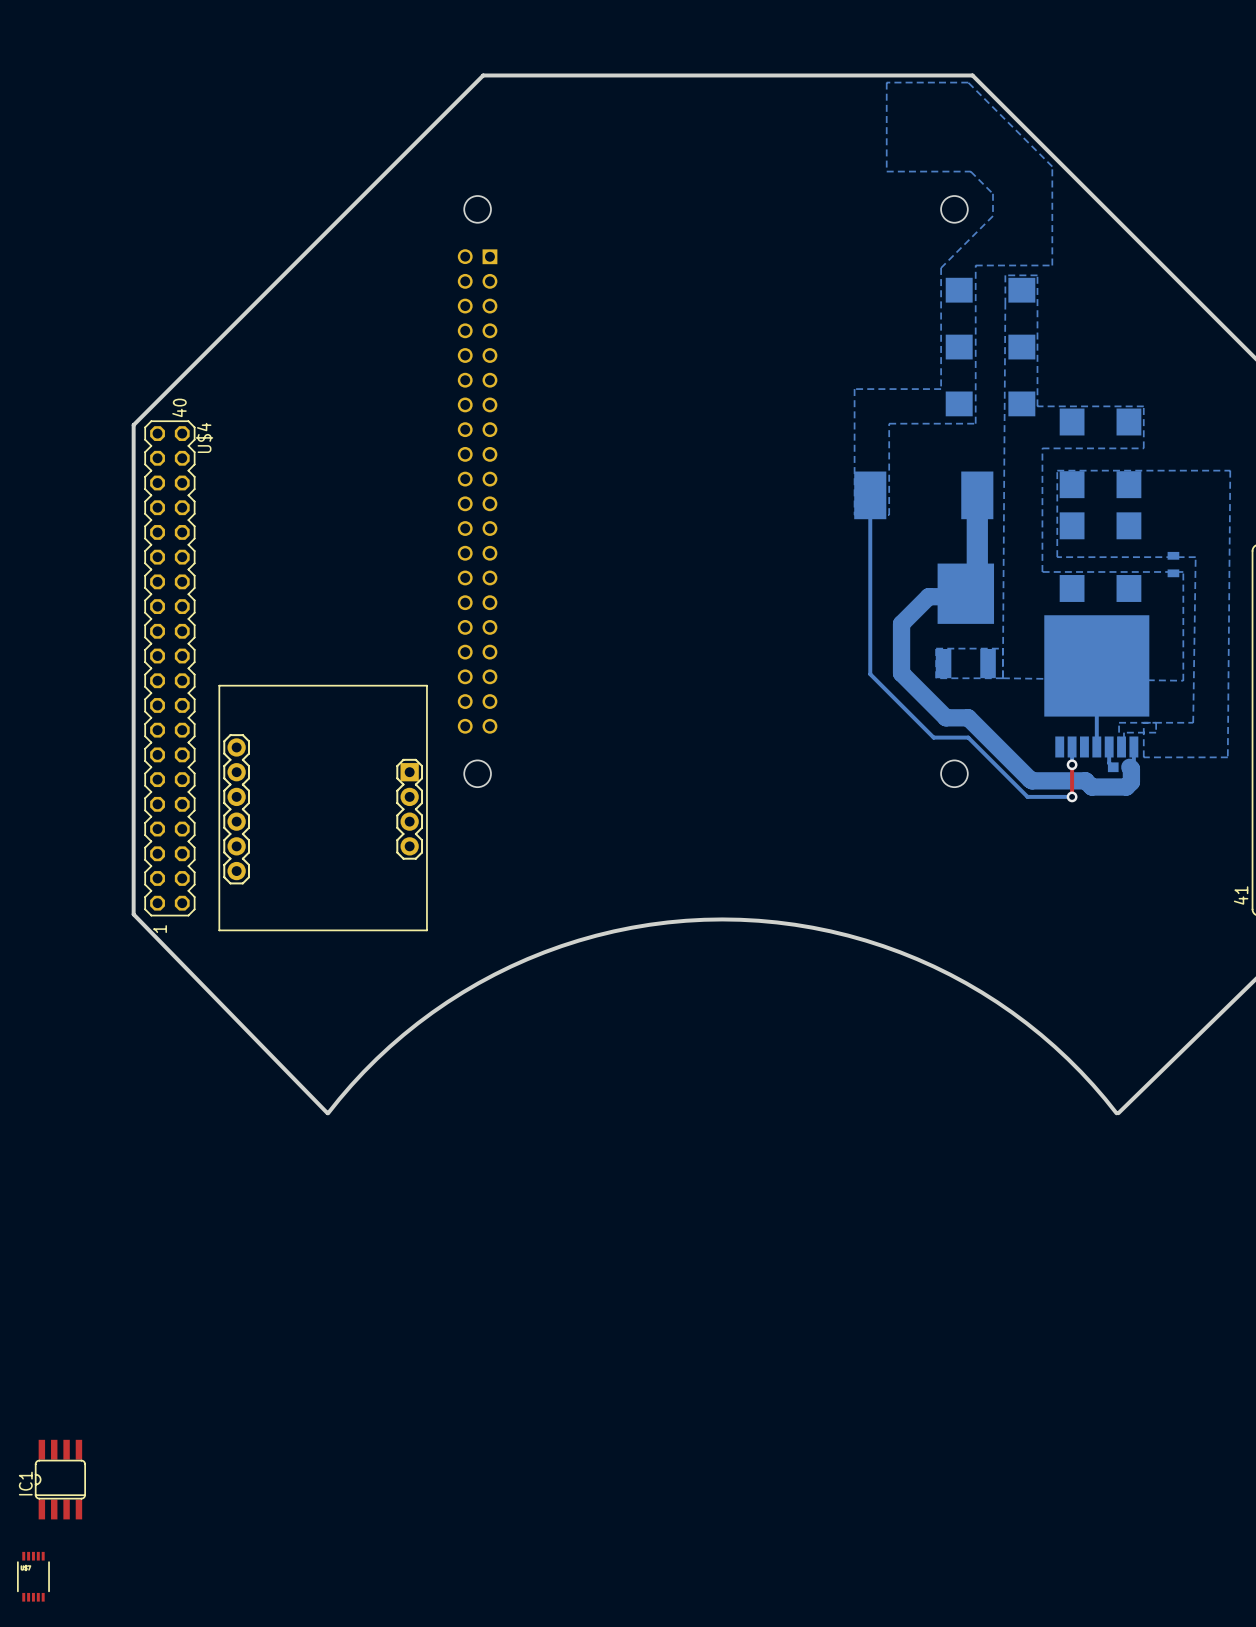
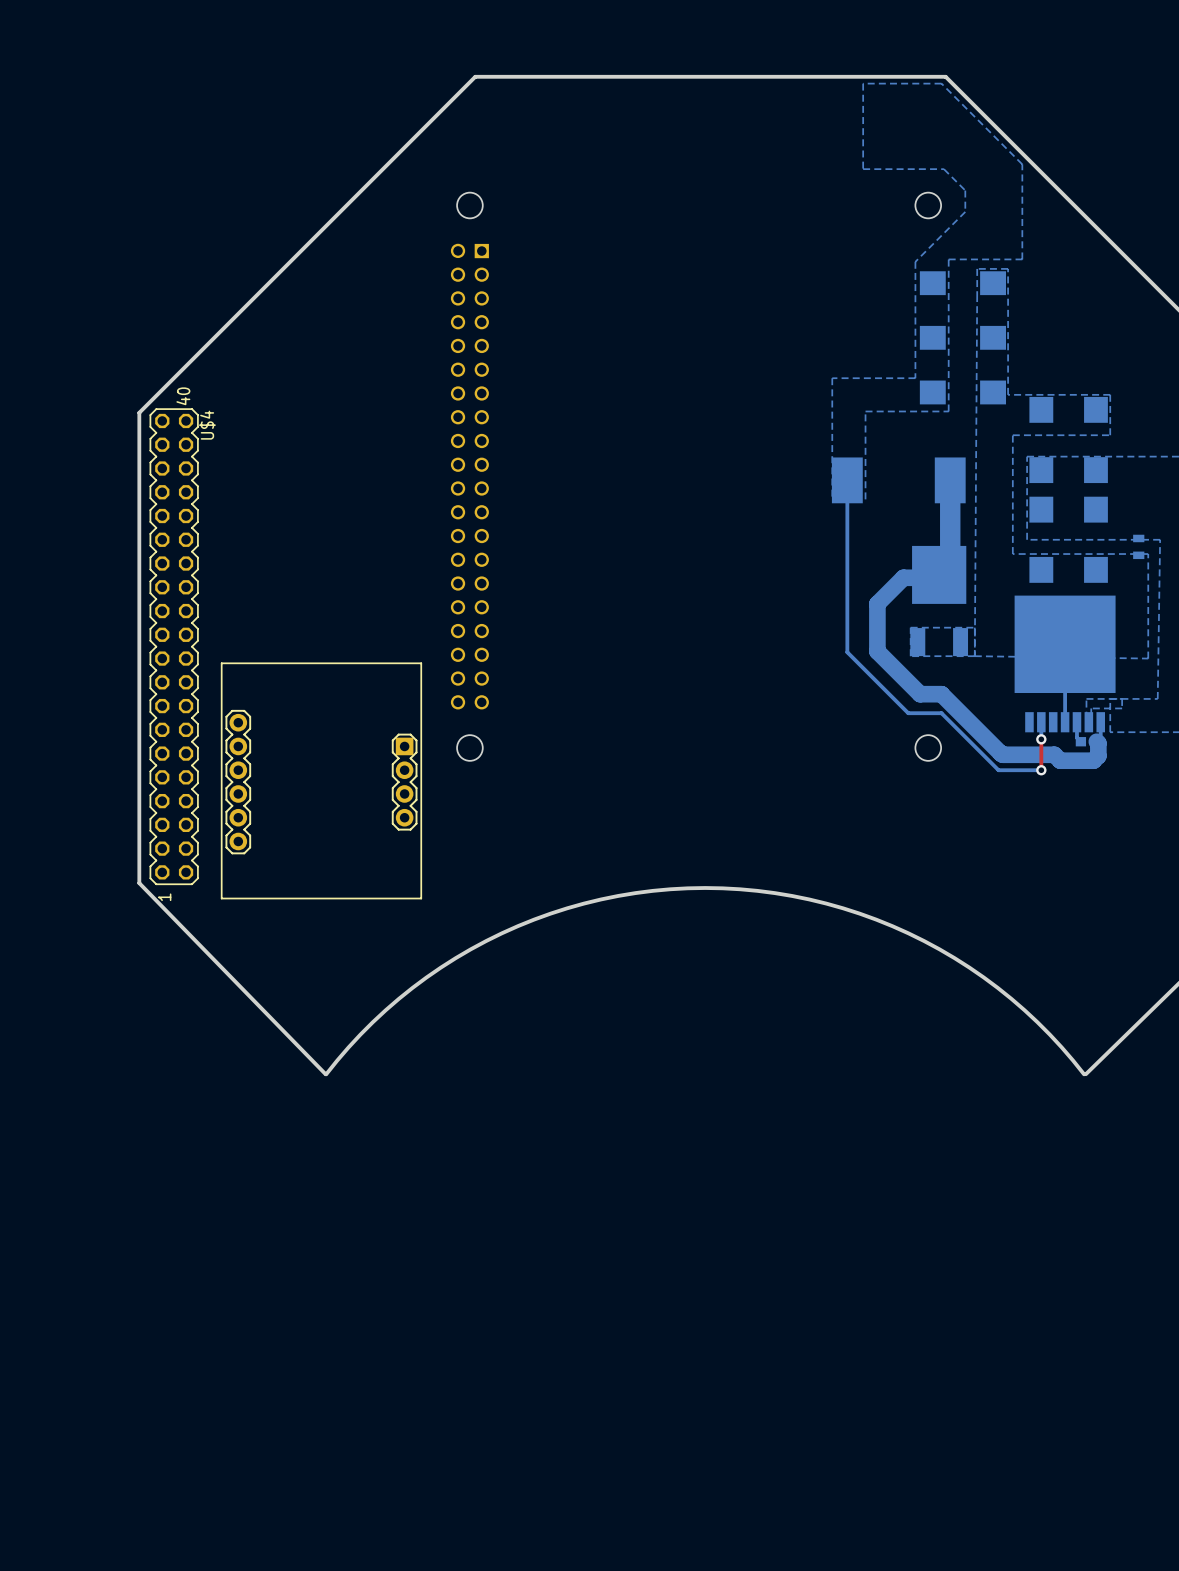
IC1: (60, 1479) -> none
part: (33, 1576) -> none

